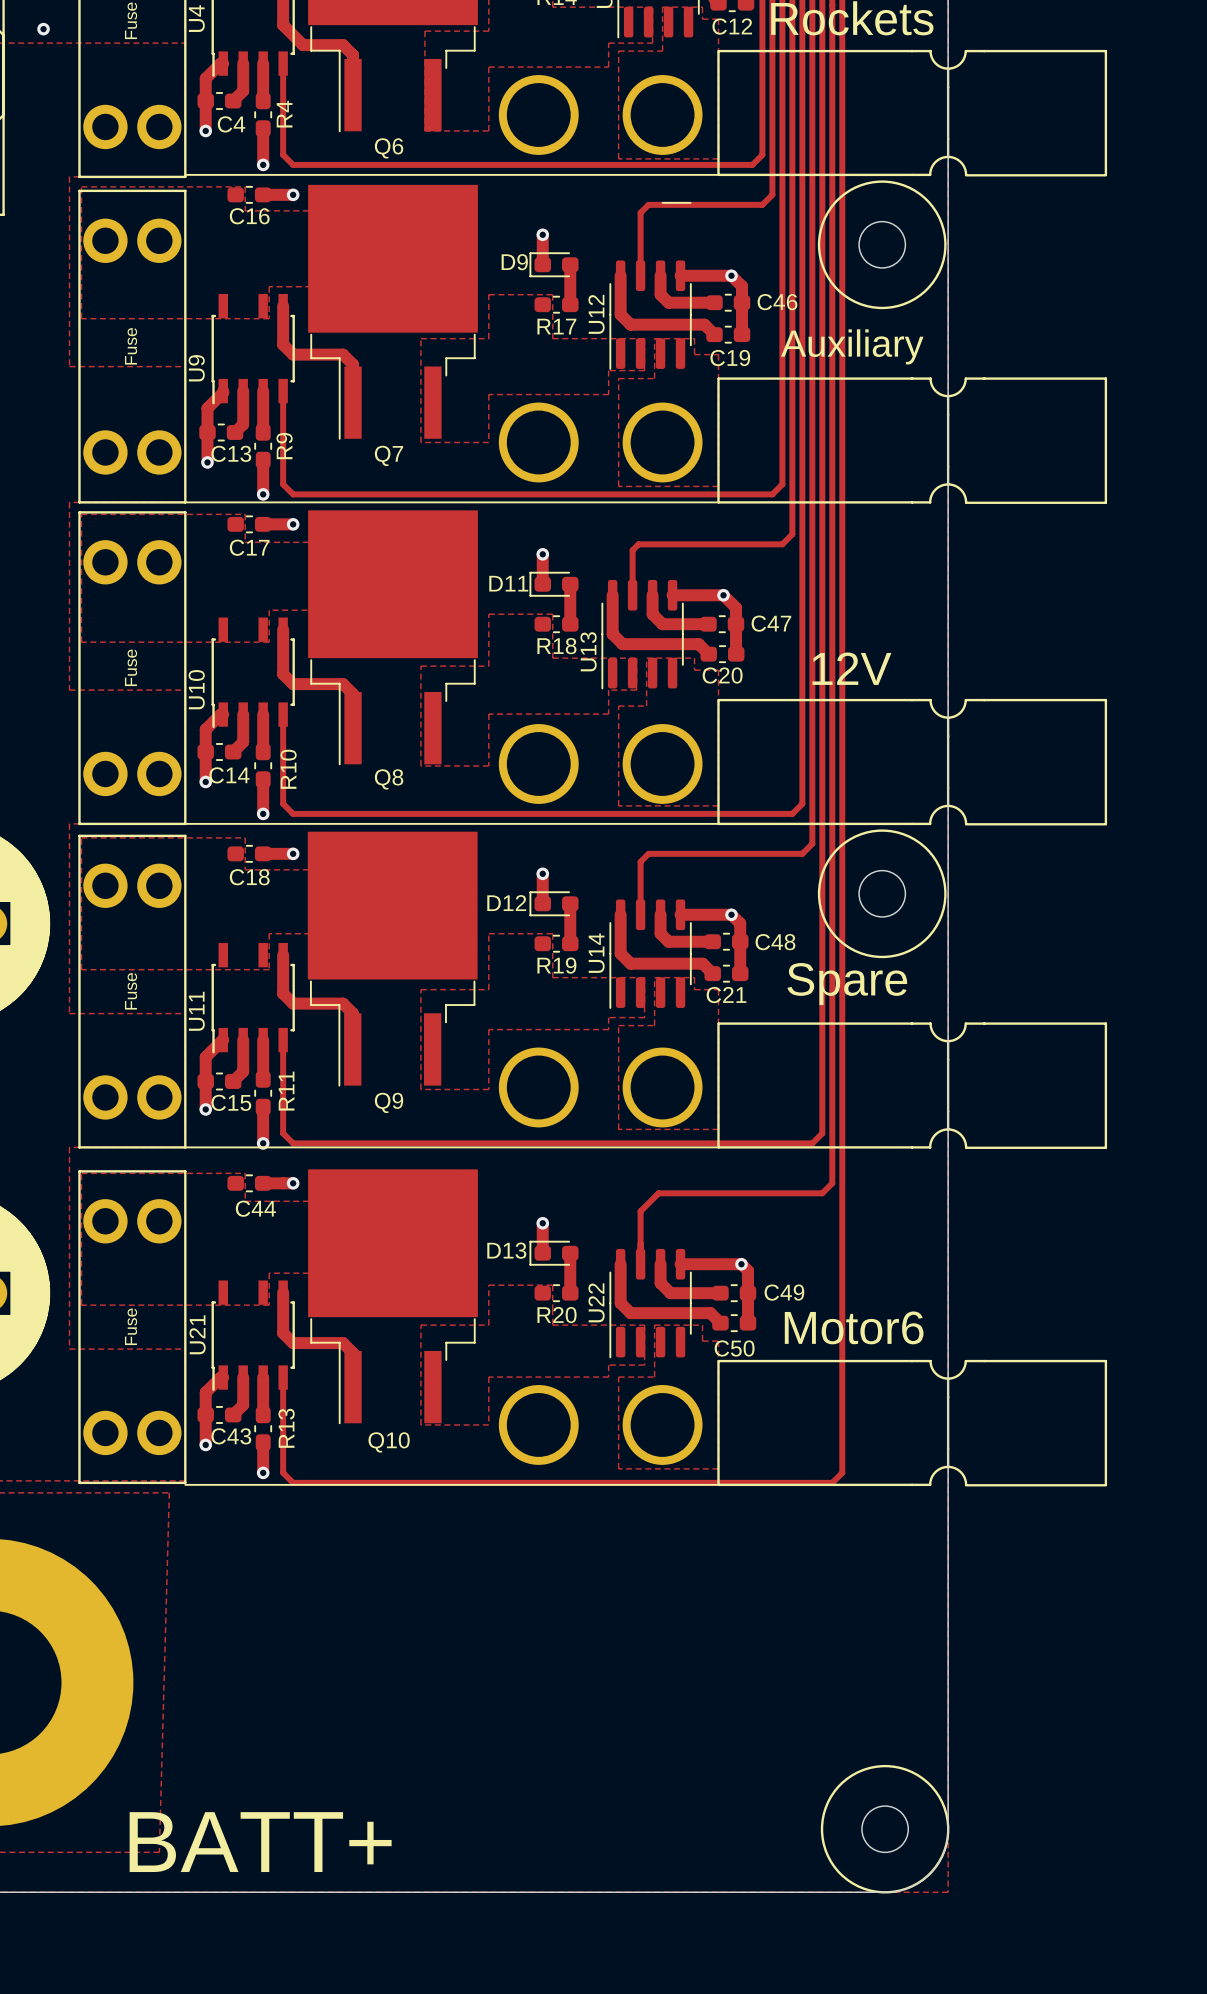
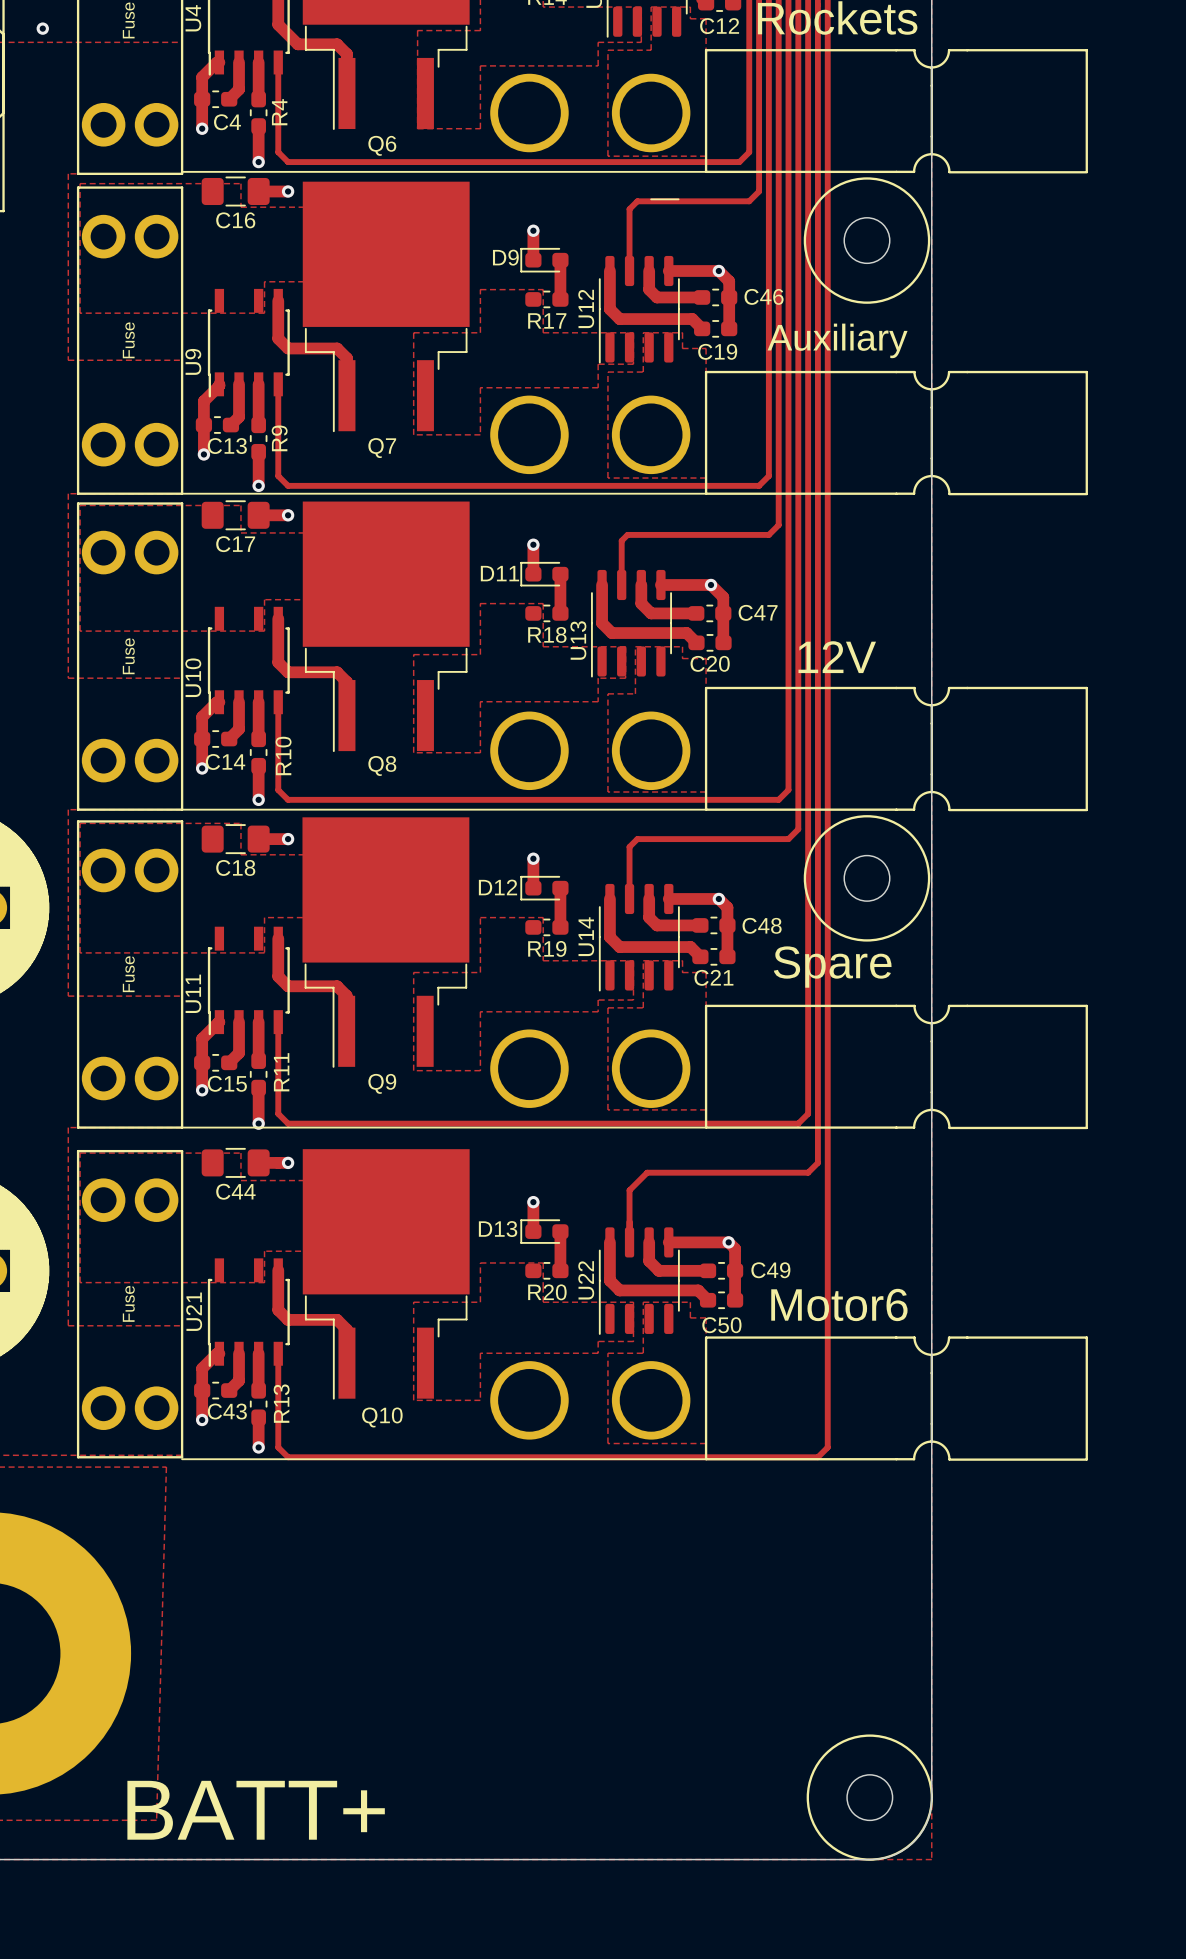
C16 footprint: [227, 185, 272, 204] -> [201, 176, 270, 207]
C17 footprint: [227, 515, 272, 534] -> [201, 500, 270, 531]
C18 footprint: [227, 844, 272, 863] -> [201, 824, 270, 855]
C44 footprint: [227, 1174, 272, 1193] -> [201, 1147, 270, 1178]

